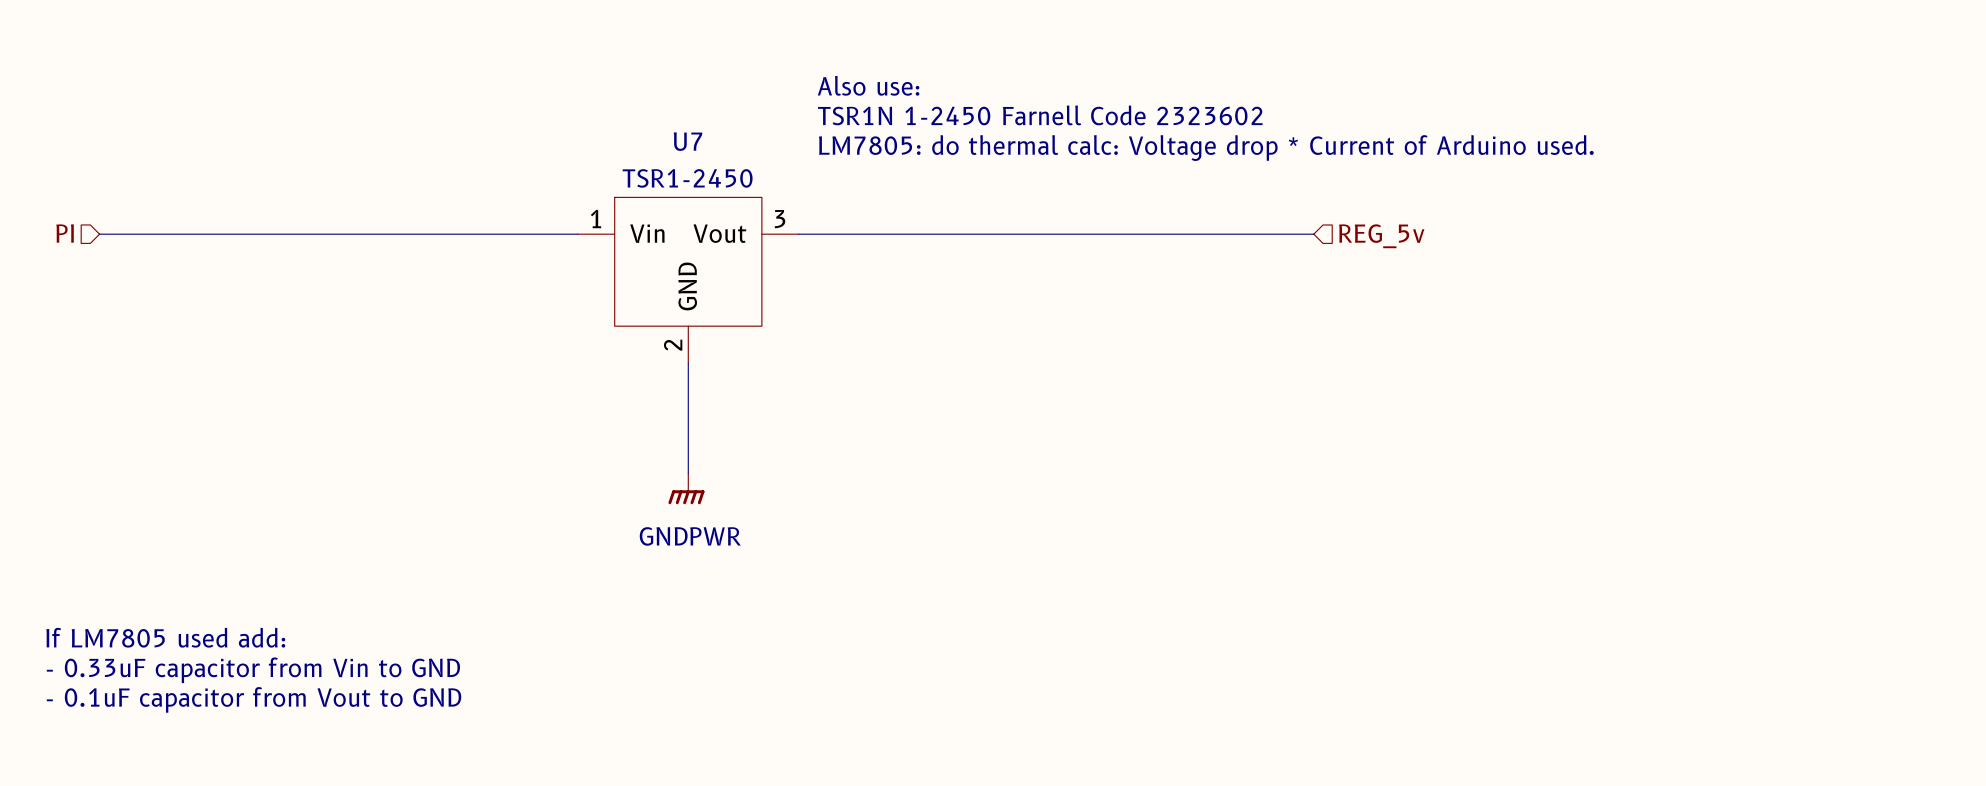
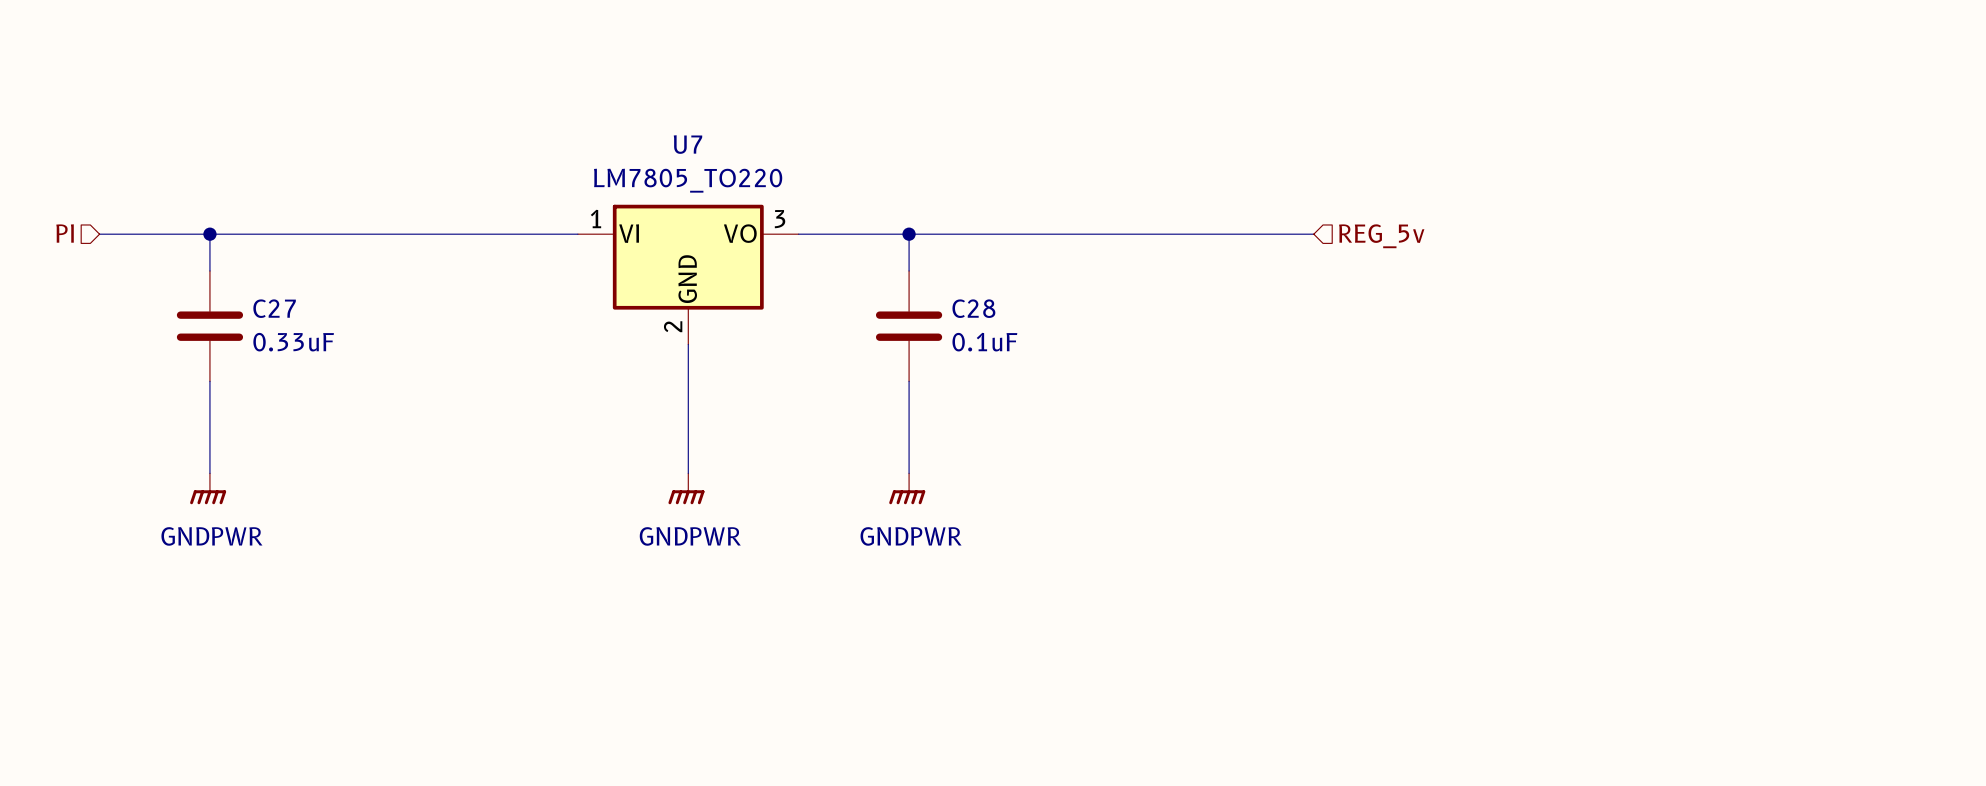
text: Also use: (868, 85) -> none
text: TSR1N 1-2450 Farnell Code 2323602 (1040, 115) -> none
text: LM7805: do thermal calc: Voltage drop * Current of Arduino used. (1206, 148) -> none
U7 value: TSR1-2450 (687, 178) -> LM7805_TO220 (688, 180)
U7 symbol: [577, 197, 799, 363] -> [577, 204, 799, 345]
wire: none -> (209, 234) (209, 270)
junction: none -> (209, 234)
wire: none -> (909, 234) (909, 270)
junction: none -> (909, 234)
C27: none -> 0.33uF (209, 326)
C28: none -> 0.1uF (909, 326)
wire: none -> (209, 381) (209, 473)
wire: none -> (909, 381) (909, 473)
power symbol: none -> GNDPWR (208, 488)
power symbol: none -> GNDPWR (907, 488)
text: If LM7805 used add: (165, 637) -> none
text: - 0.33uF capacitor from Vin to GND (253, 670) -> none
text: - 0.1uF capacitor from Vout to GND (254, 699) -> none

